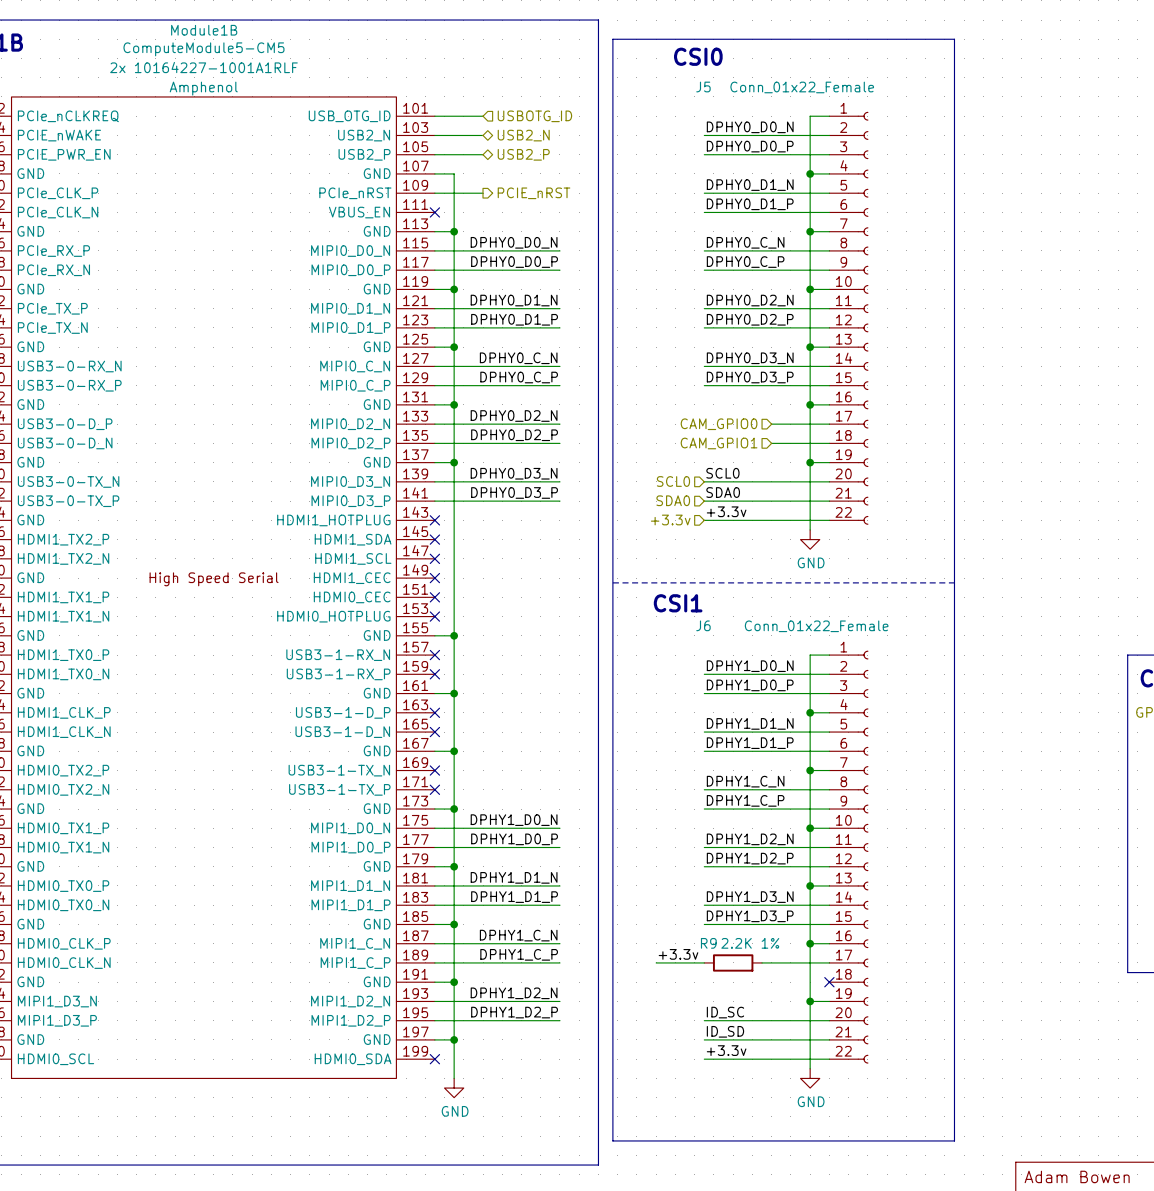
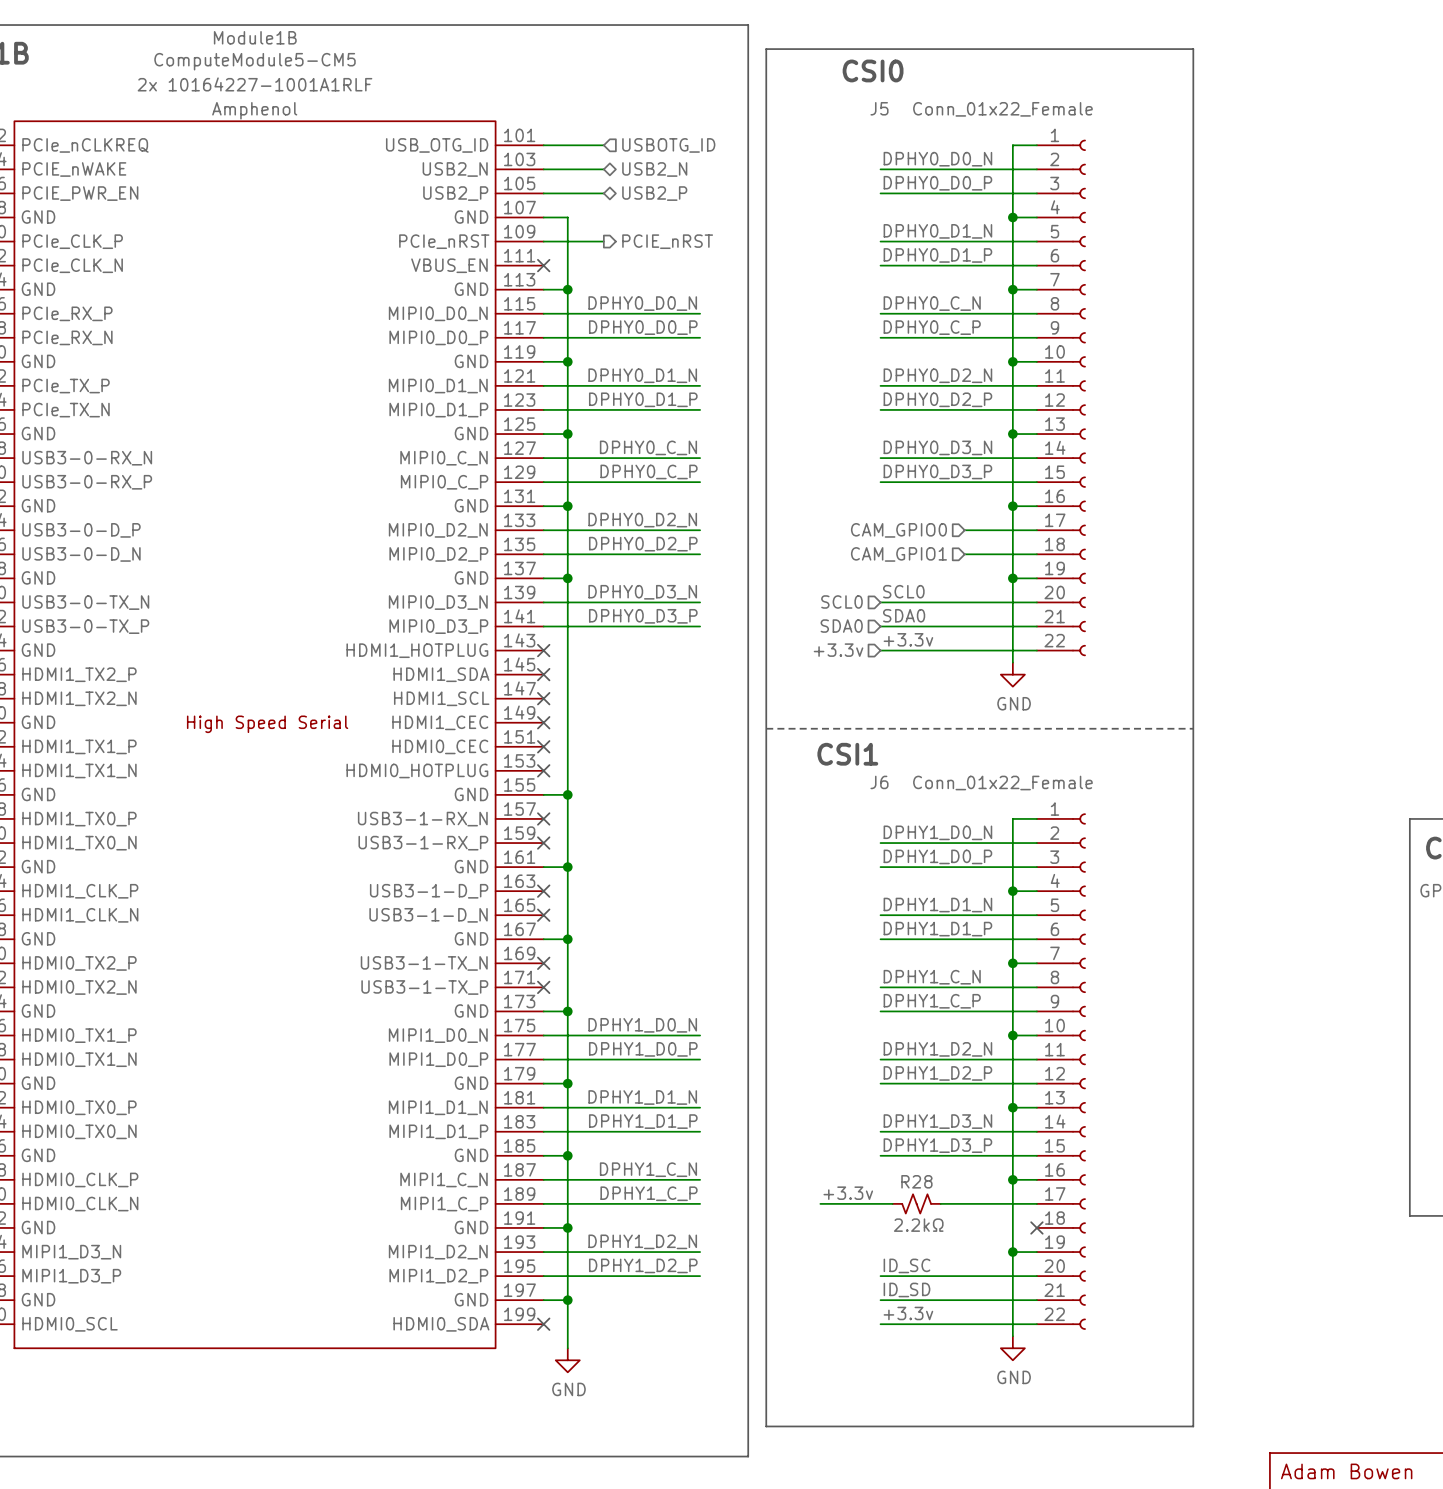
J6 value position: Conn_01x22_Female (816, 626) -> Conn_01x22_Female (1002, 783)
R9: 2.2K 1% (733, 962) -> none
R28: none -> 2.2kΩ (916, 1203)

